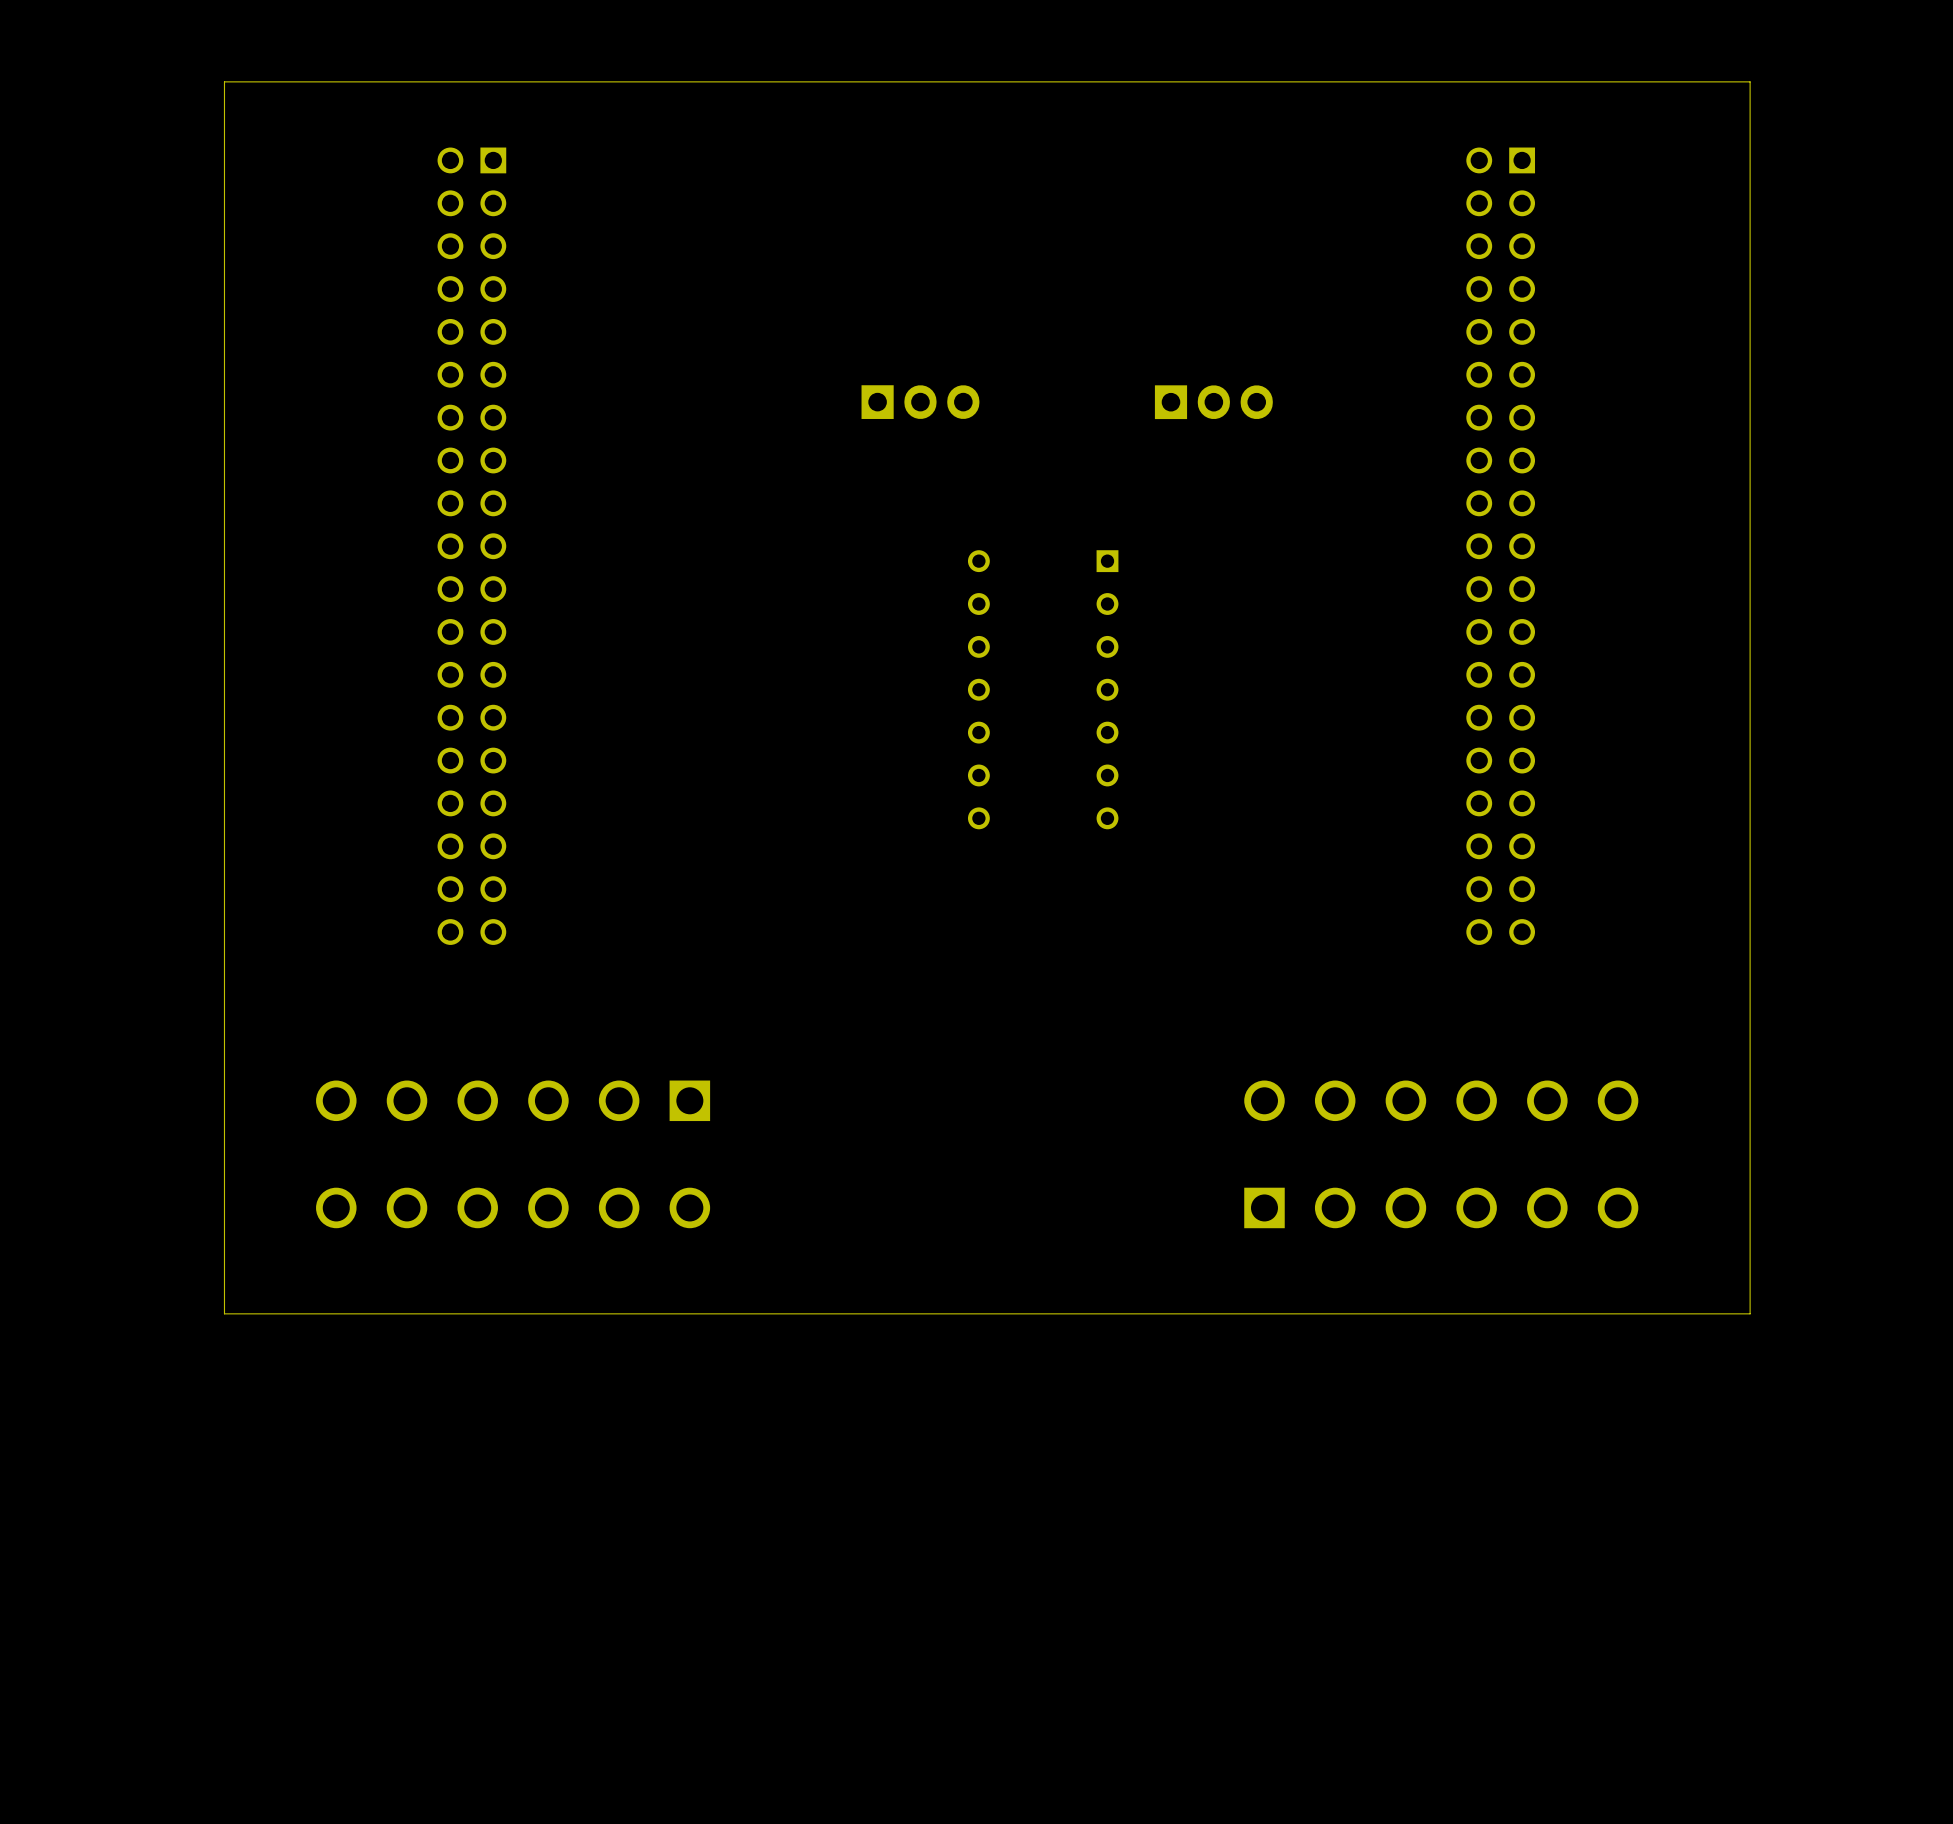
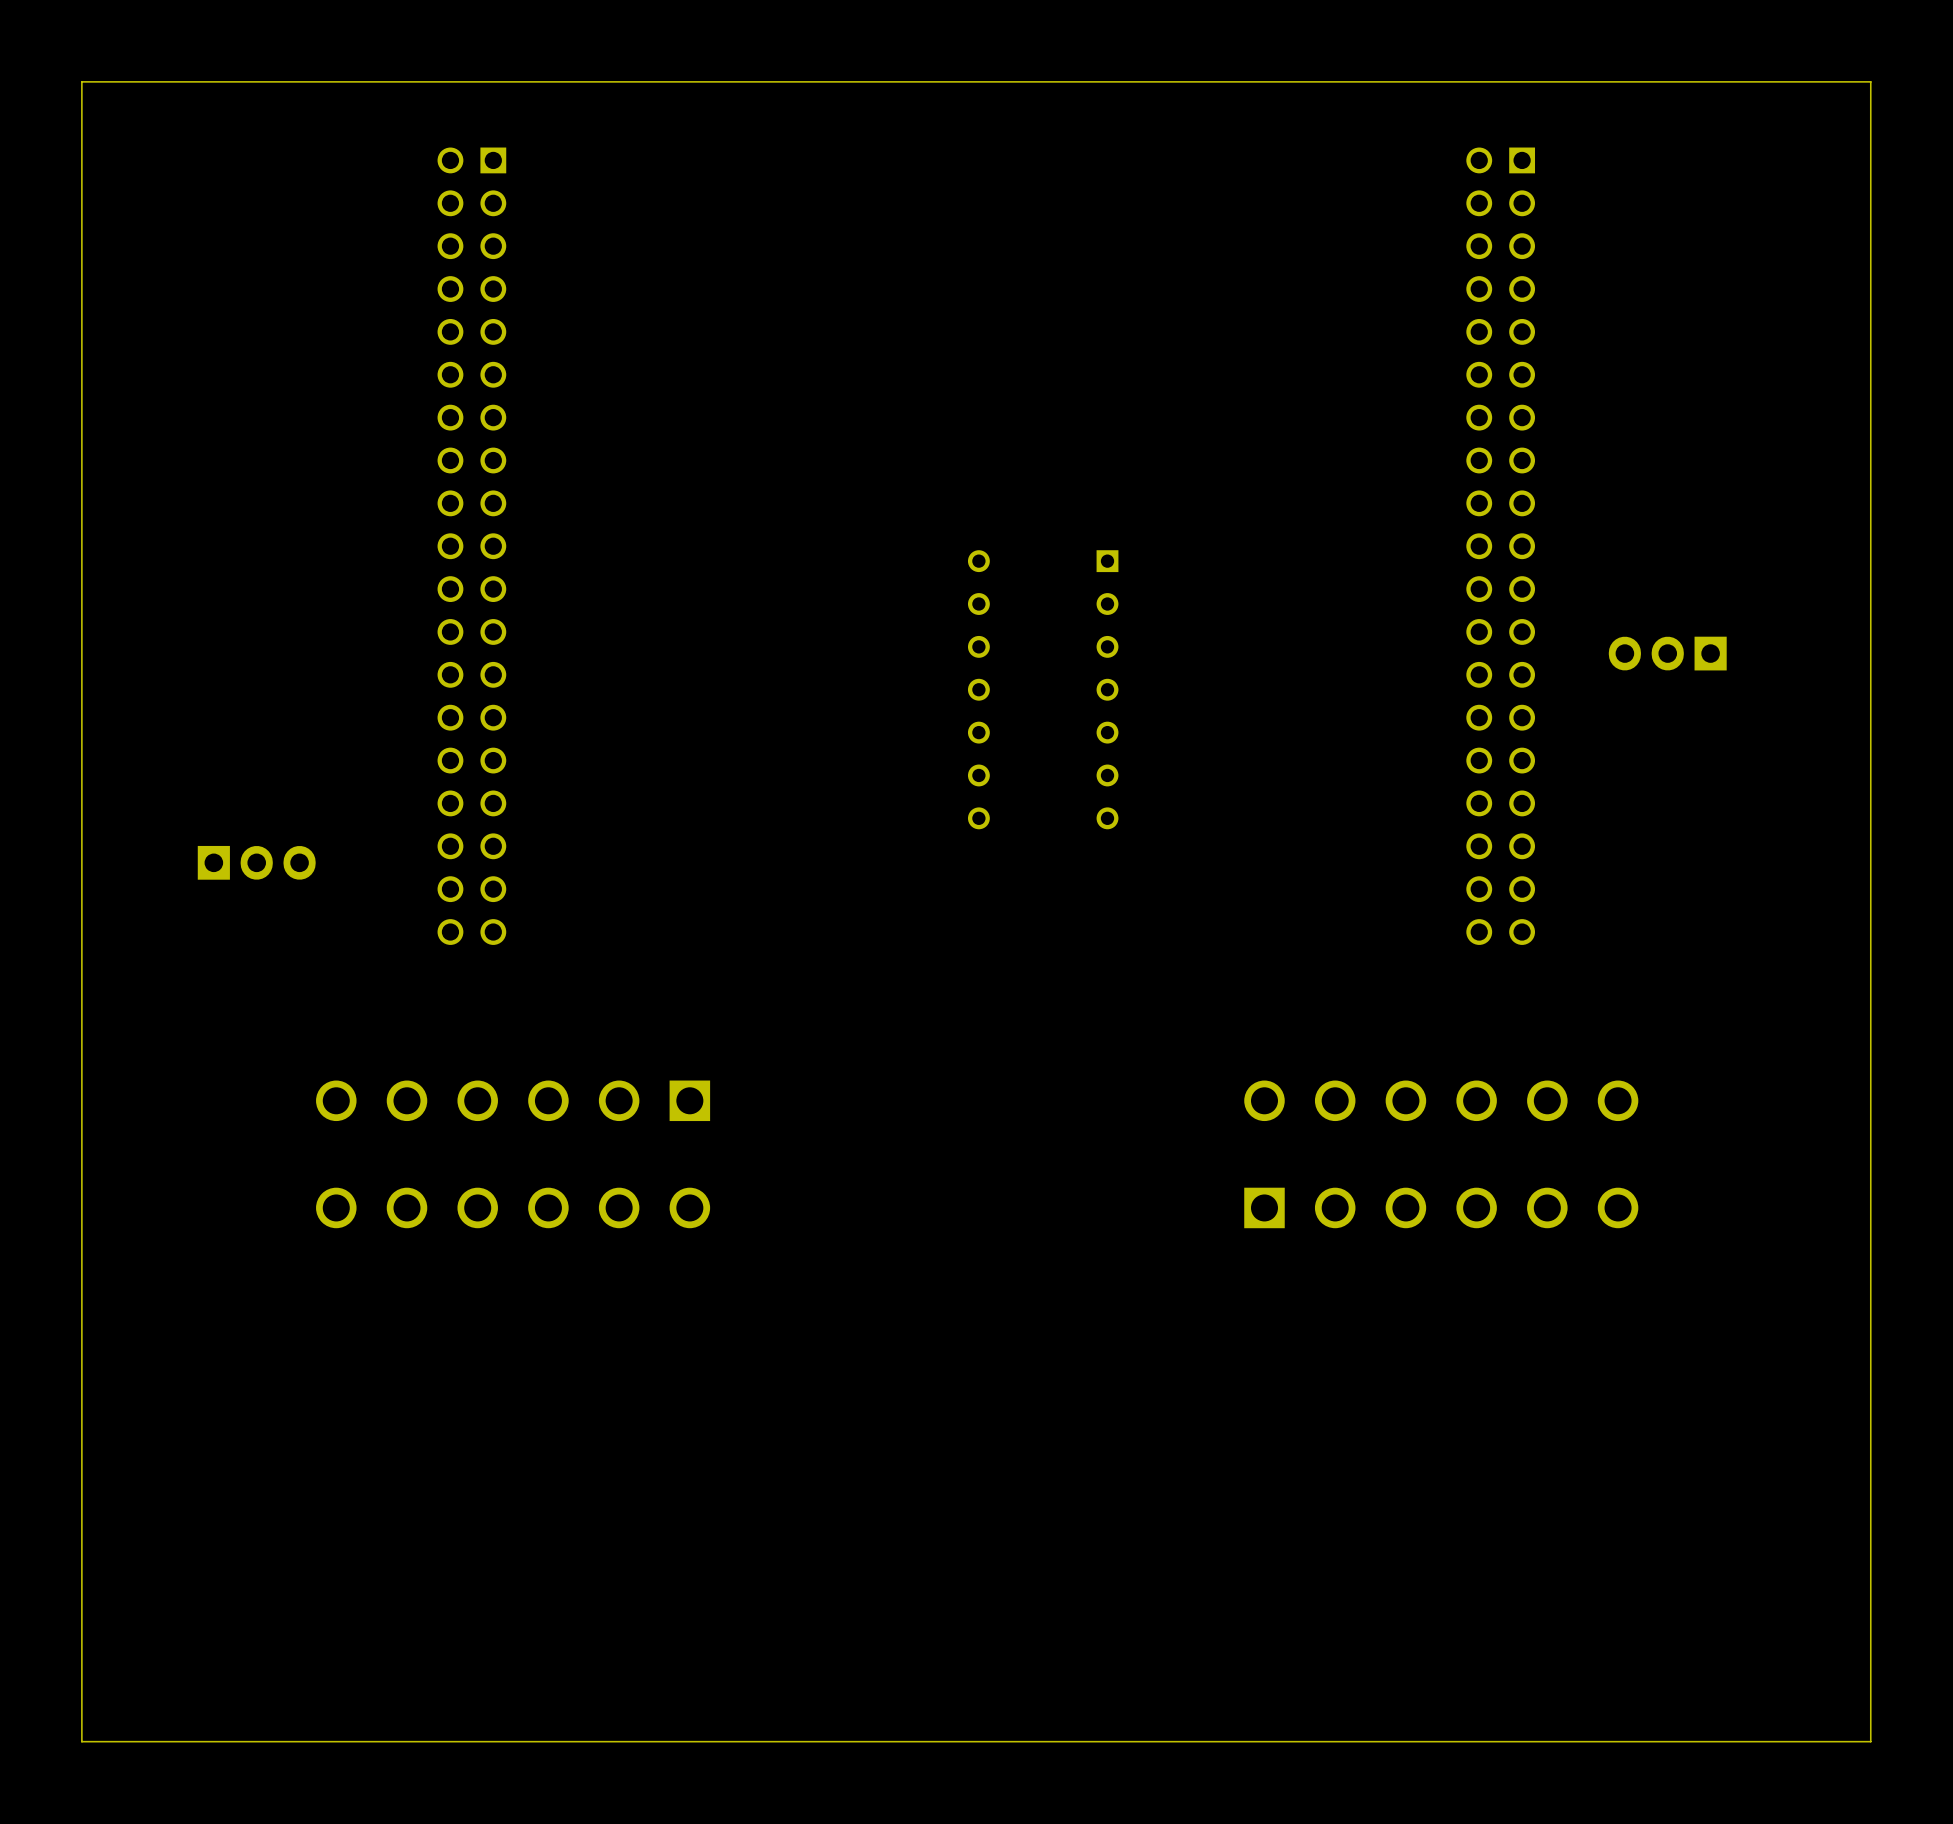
board edge: (1750, 81) (1750, 1313) (224, 1313) (224, 81) -> (1750, 81) (1870, 81) (1870, 1741) (81, 1741) (81, 81) (224, 81)
part: (920, 402) -> none
part: (1213, 402) -> none
part: none -> (1667, 653)
part: none -> (256, 862)

